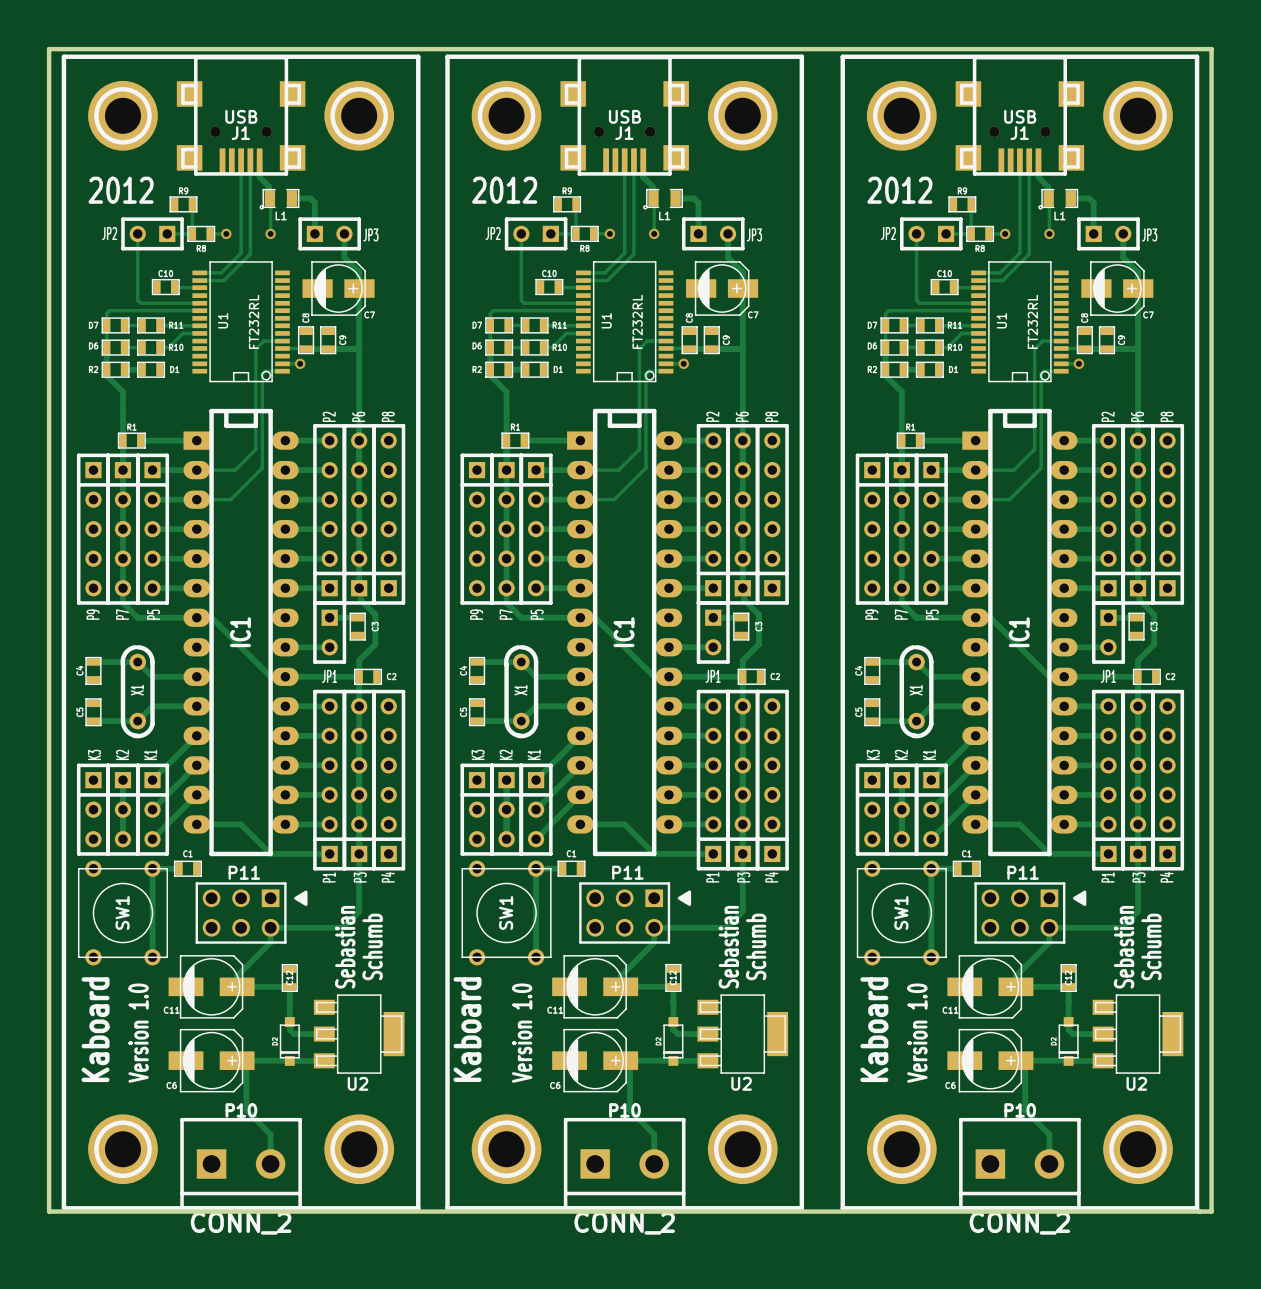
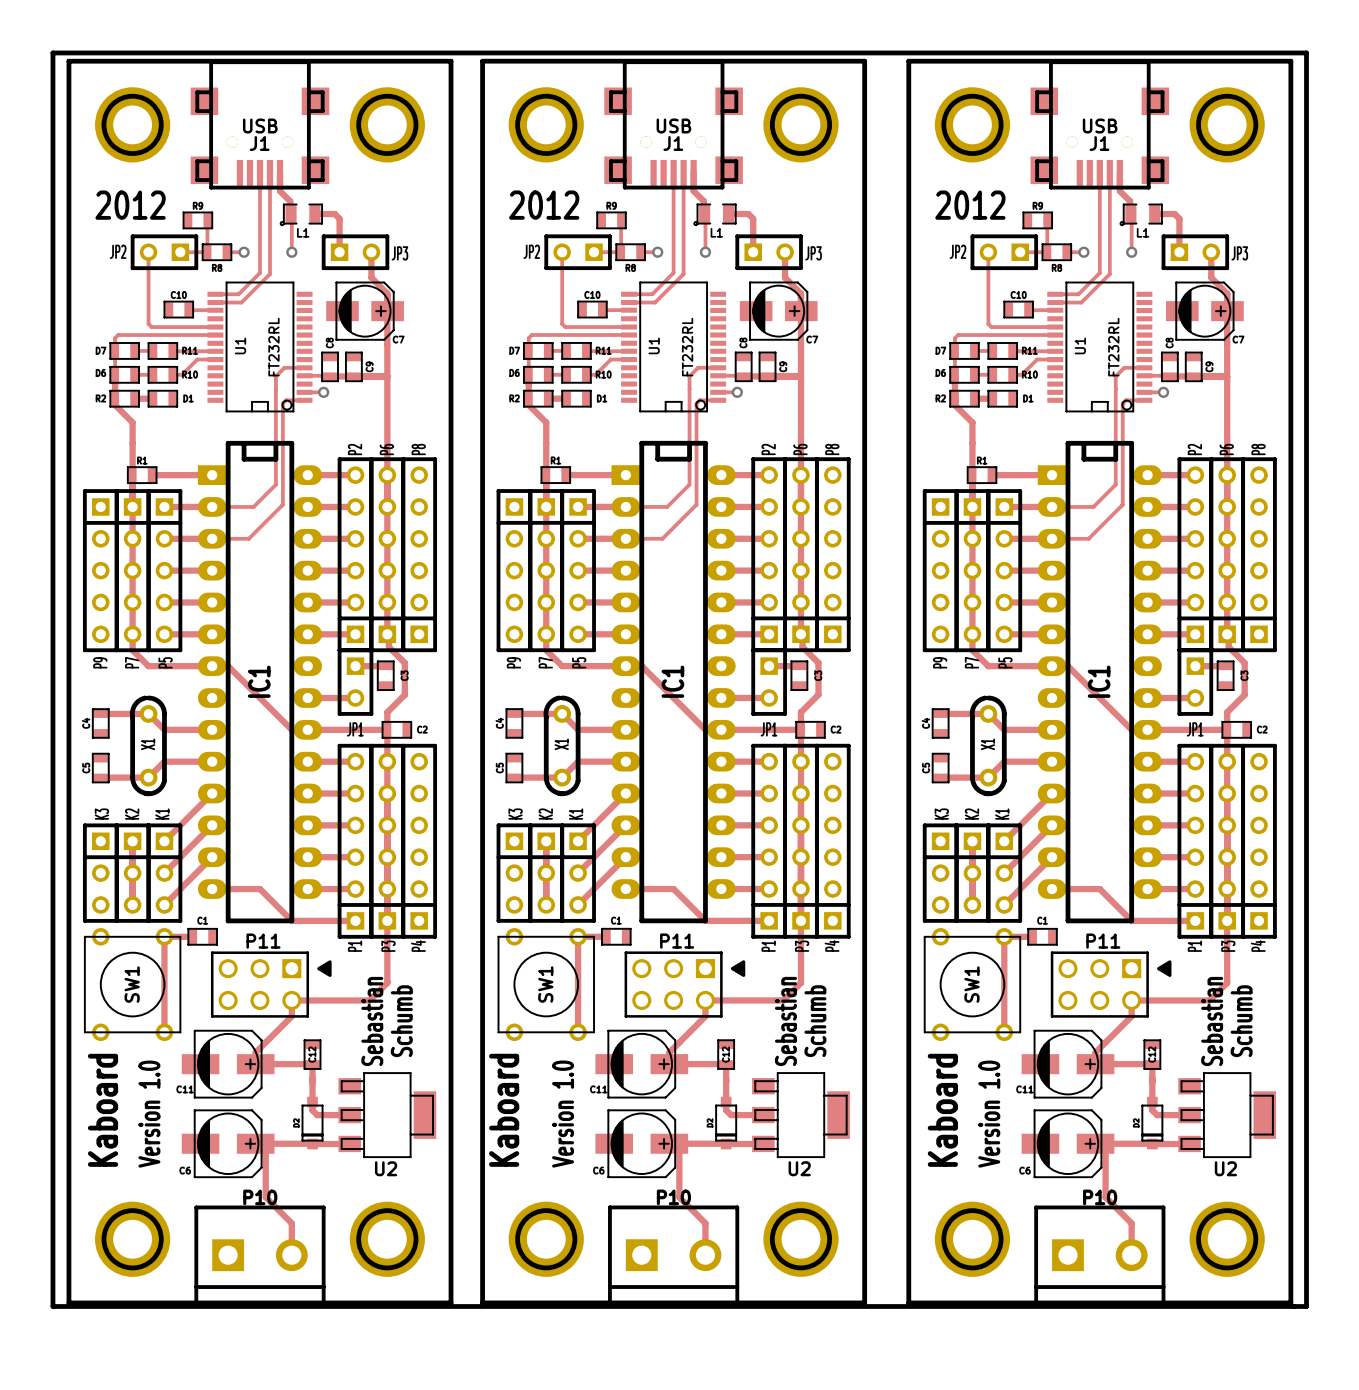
P10 value: CONN_2 (241, 1223) -> none
P10 value: CONN_2 (624, 1223) -> none
P10 value: CONN_2 (1019, 1223) -> none

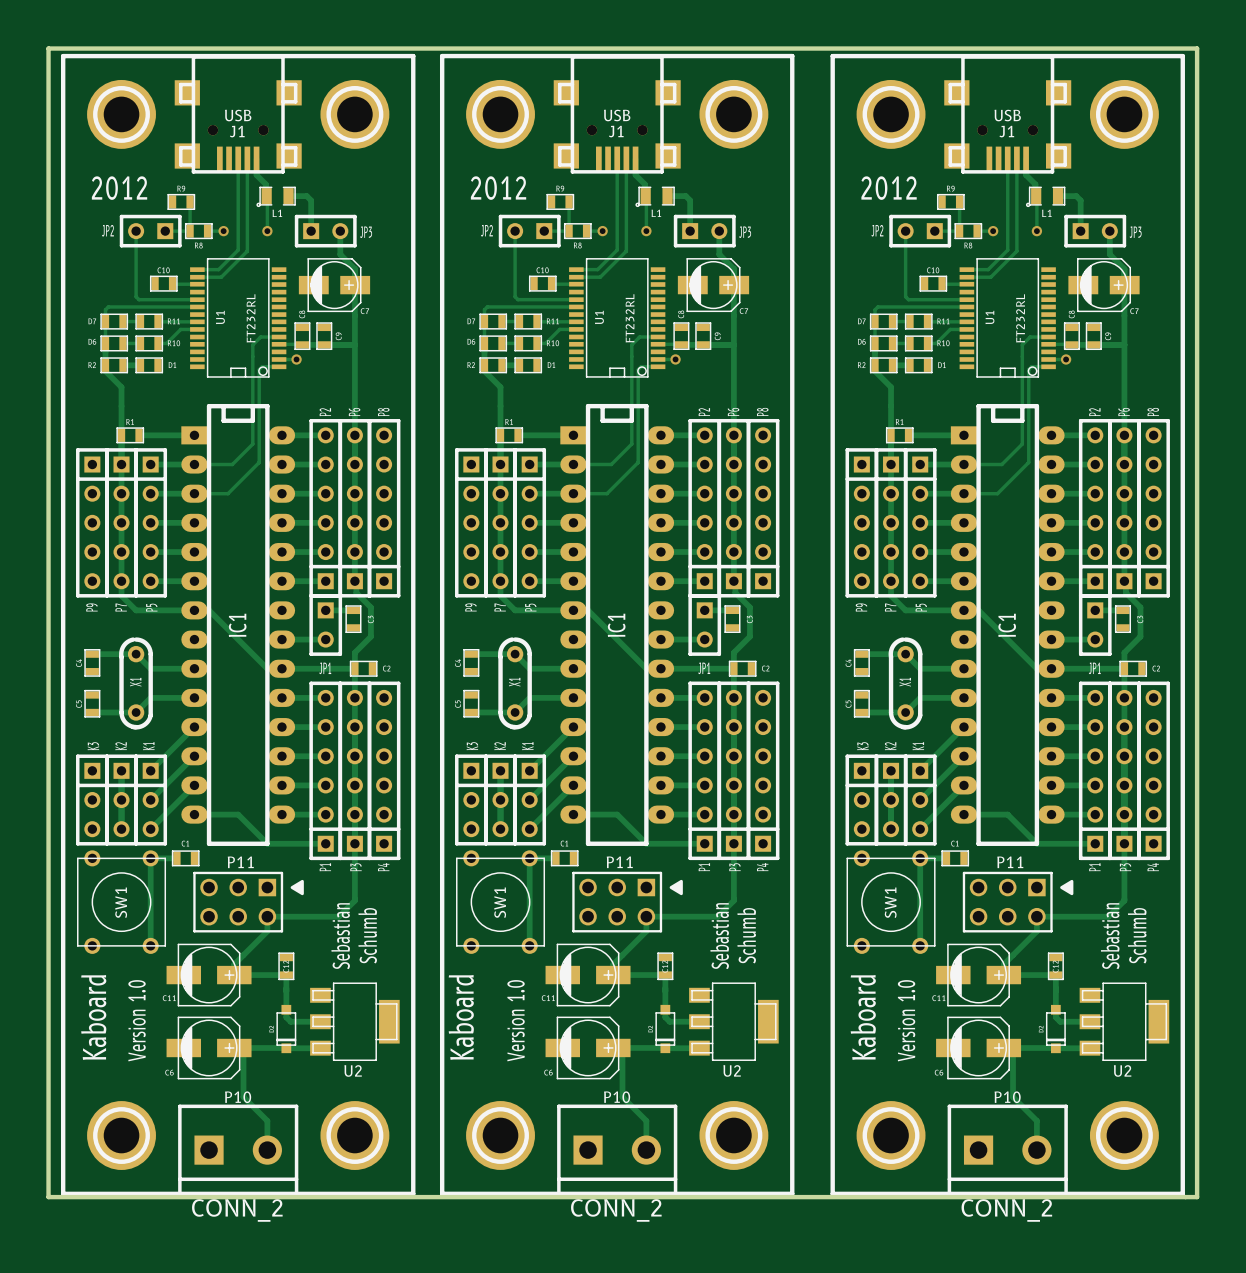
P10 value: none -> CONN_2 (237, 1210)
P10 value: none -> CONN_2 (616, 1210)
P10 value: none -> CONN_2 (1006, 1210)

